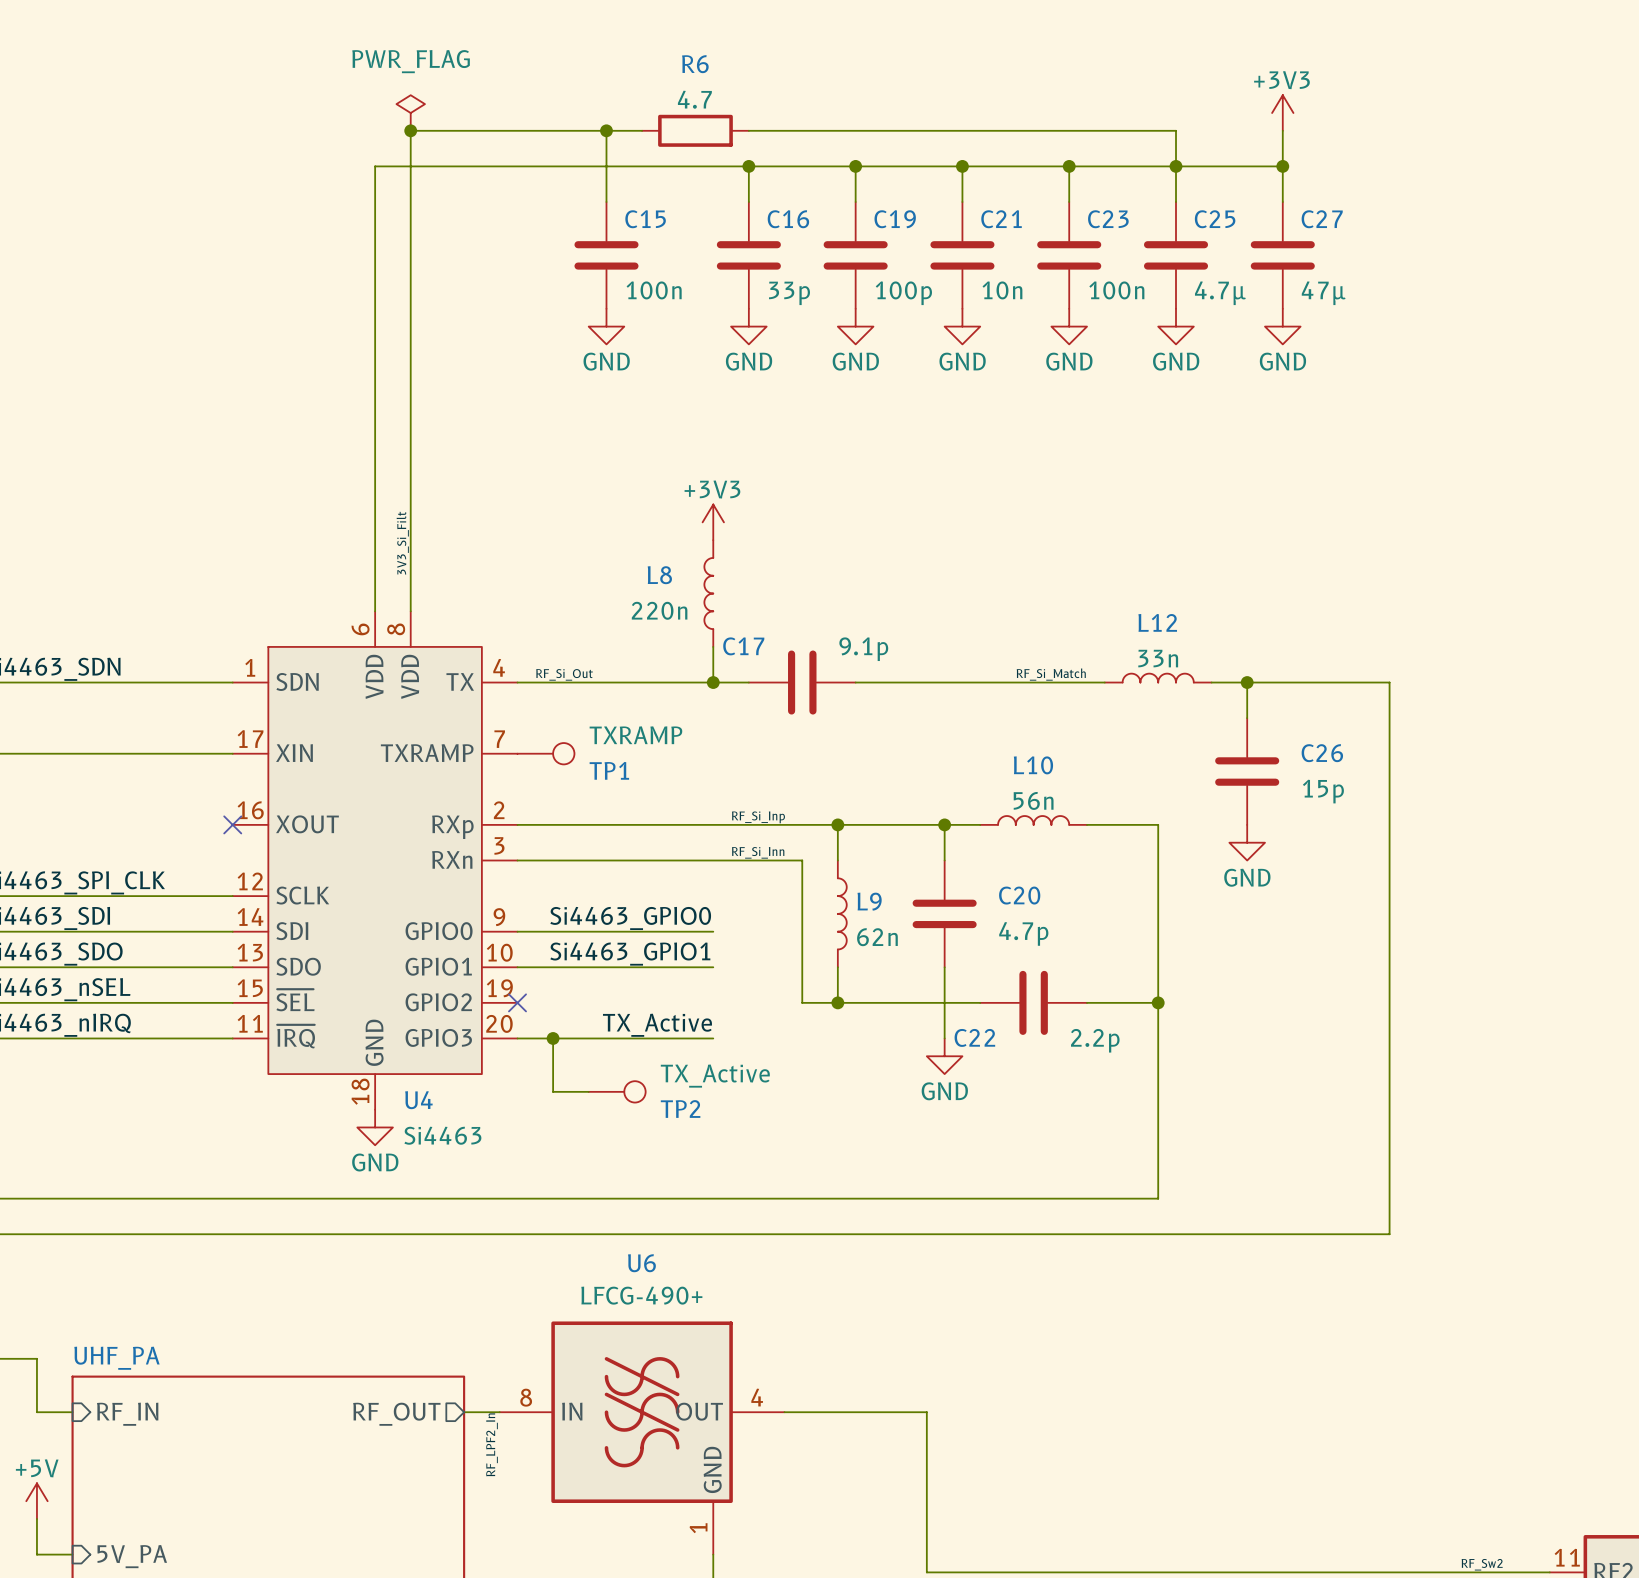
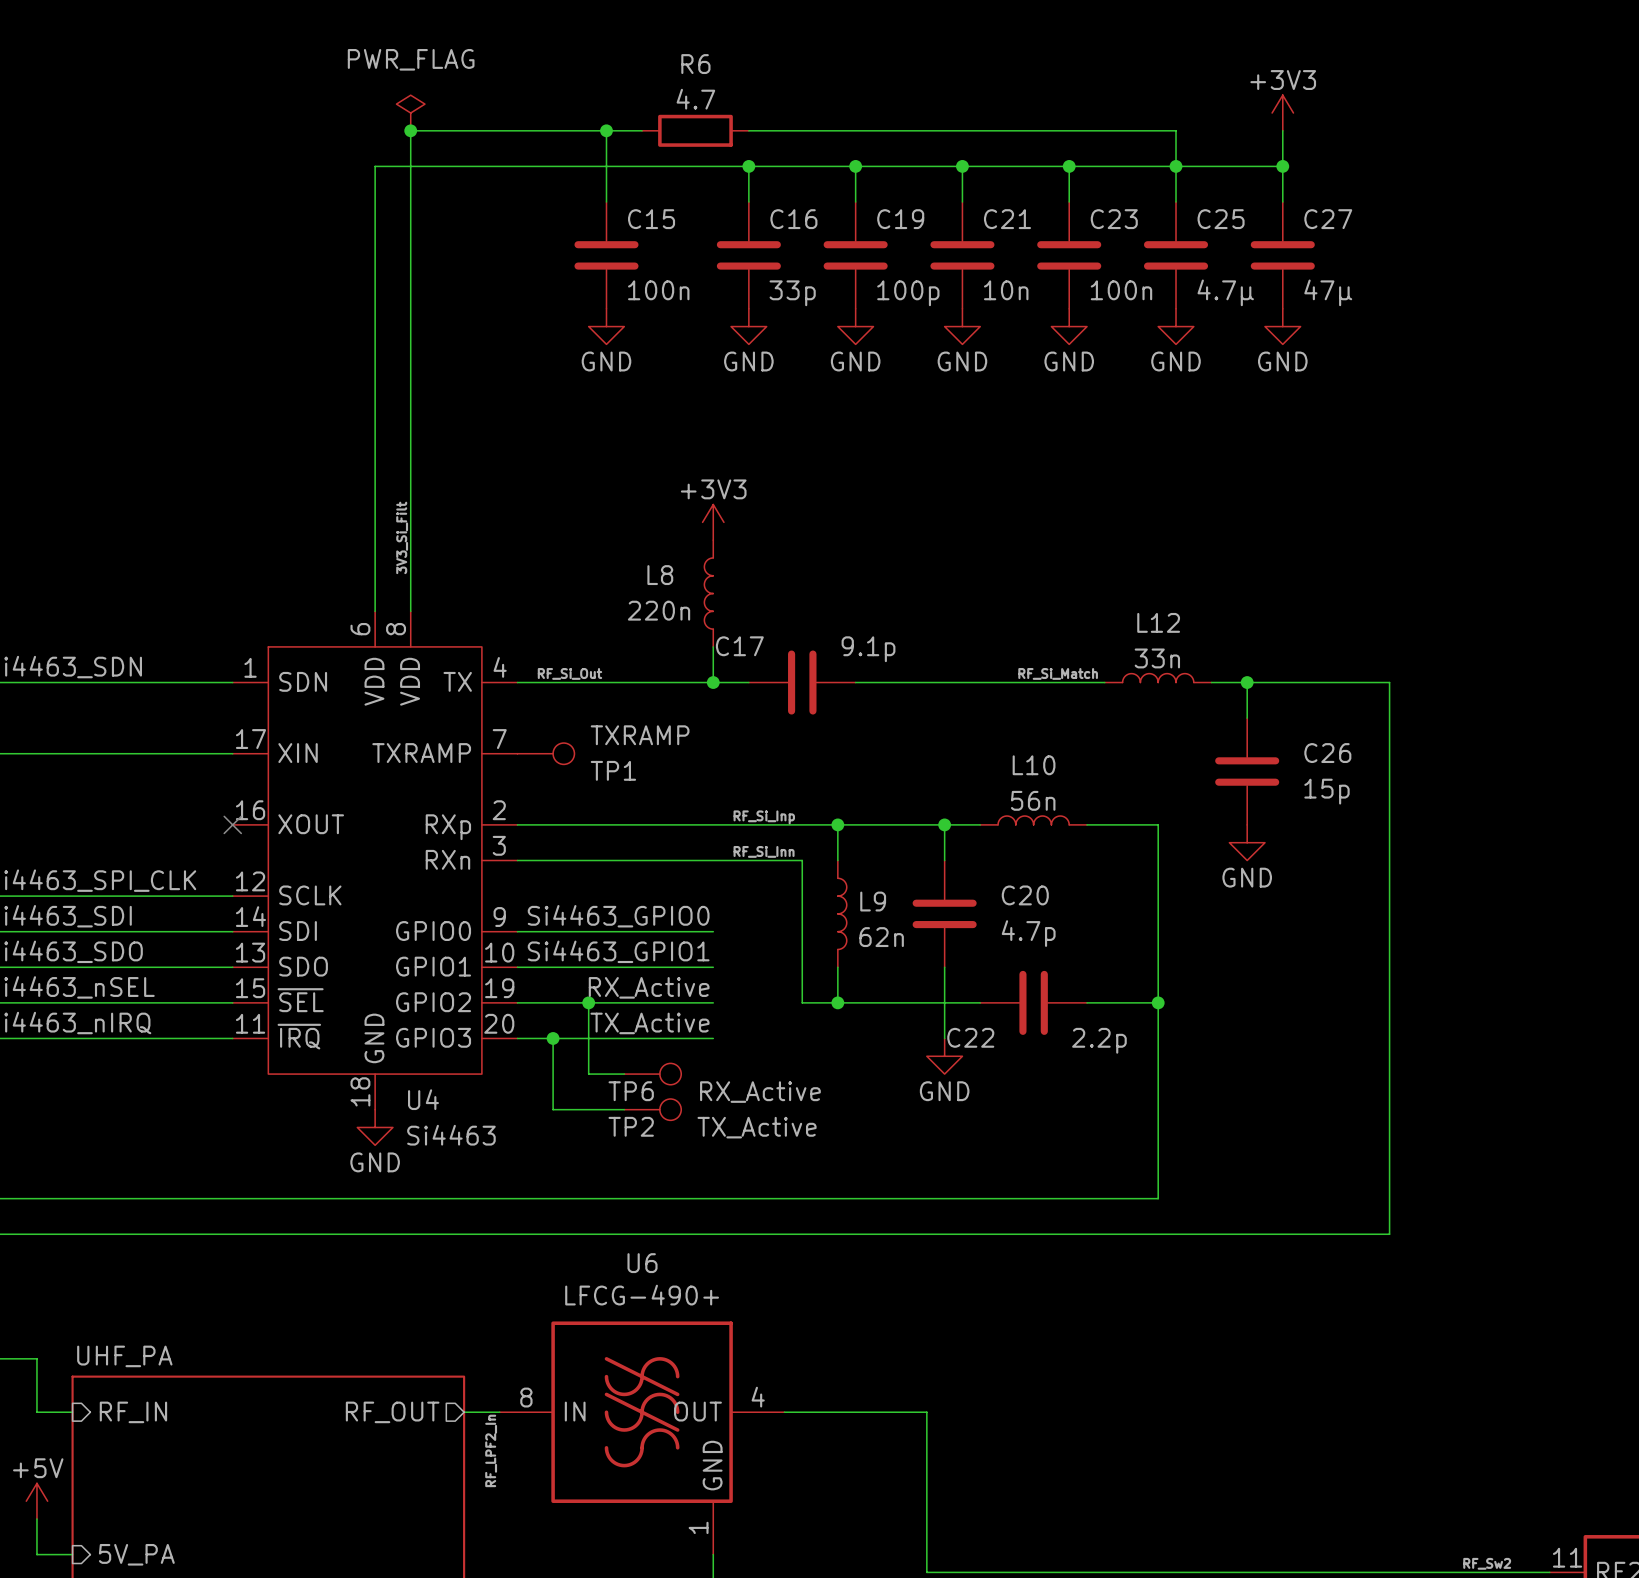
label: none -> RX_Active (649, 987)
wire: none -> (517, 1002) (713, 1002)
no-connect mark: (517, 1002) -> none
wire: none -> (588, 1002) (588, 1074) (624, 1074)
junction: none -> (588, 1002)
TP6: none -> RX_Active (652, 1074)
TP2 value position: TX_Active (715, 1076) -> TX_Active (757, 1127)
wire: (553, 1091) (588, 1091) -> (553, 1091) (553, 1109) (624, 1109)
TP2 position: (617, 1091) -> (652, 1109)
TP2 name position: TP2 (680, 1109) -> TP2 (631, 1126)

